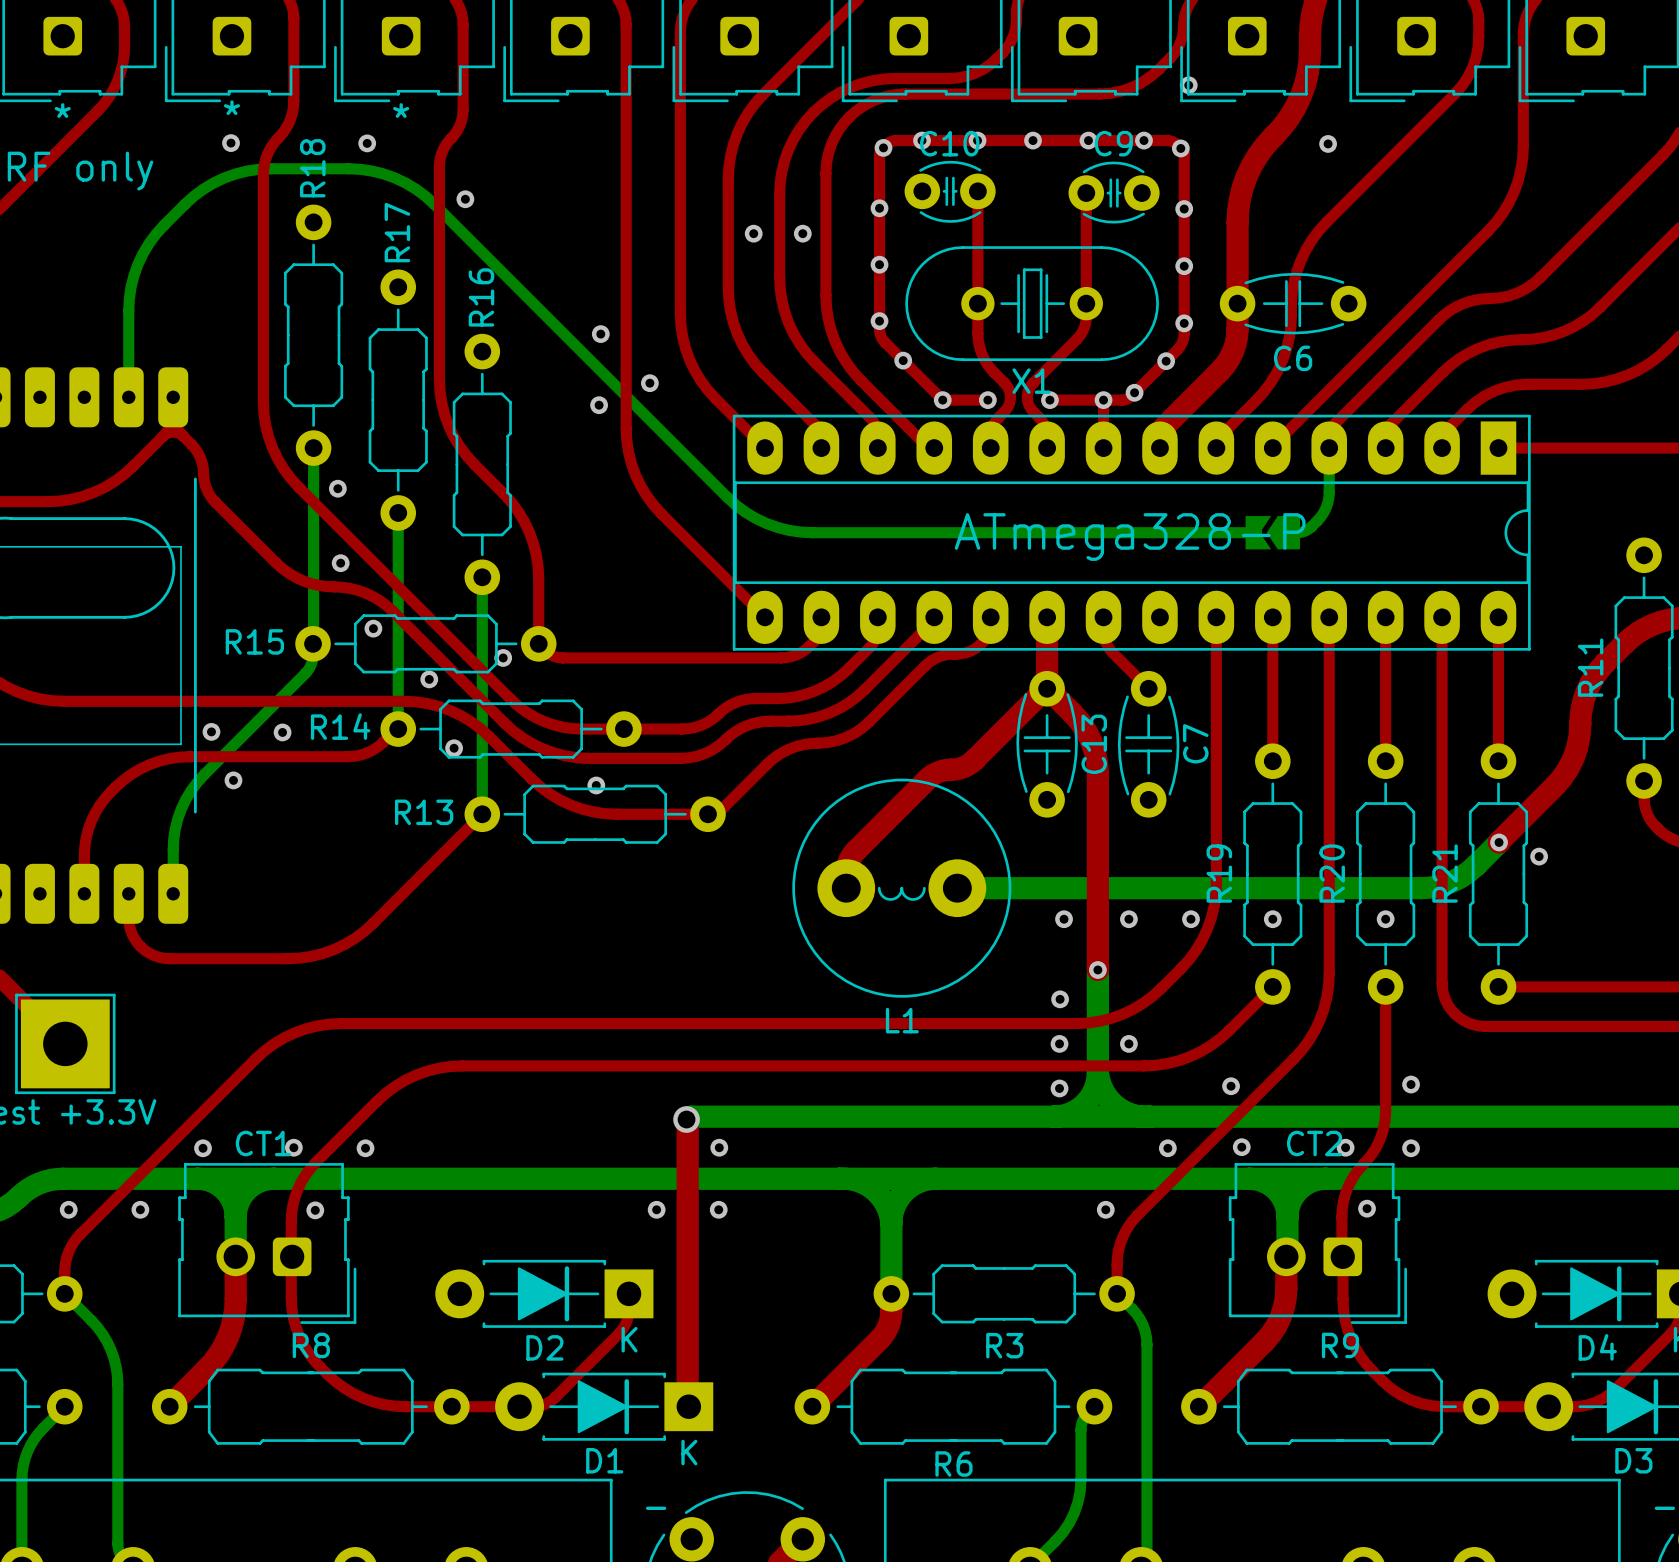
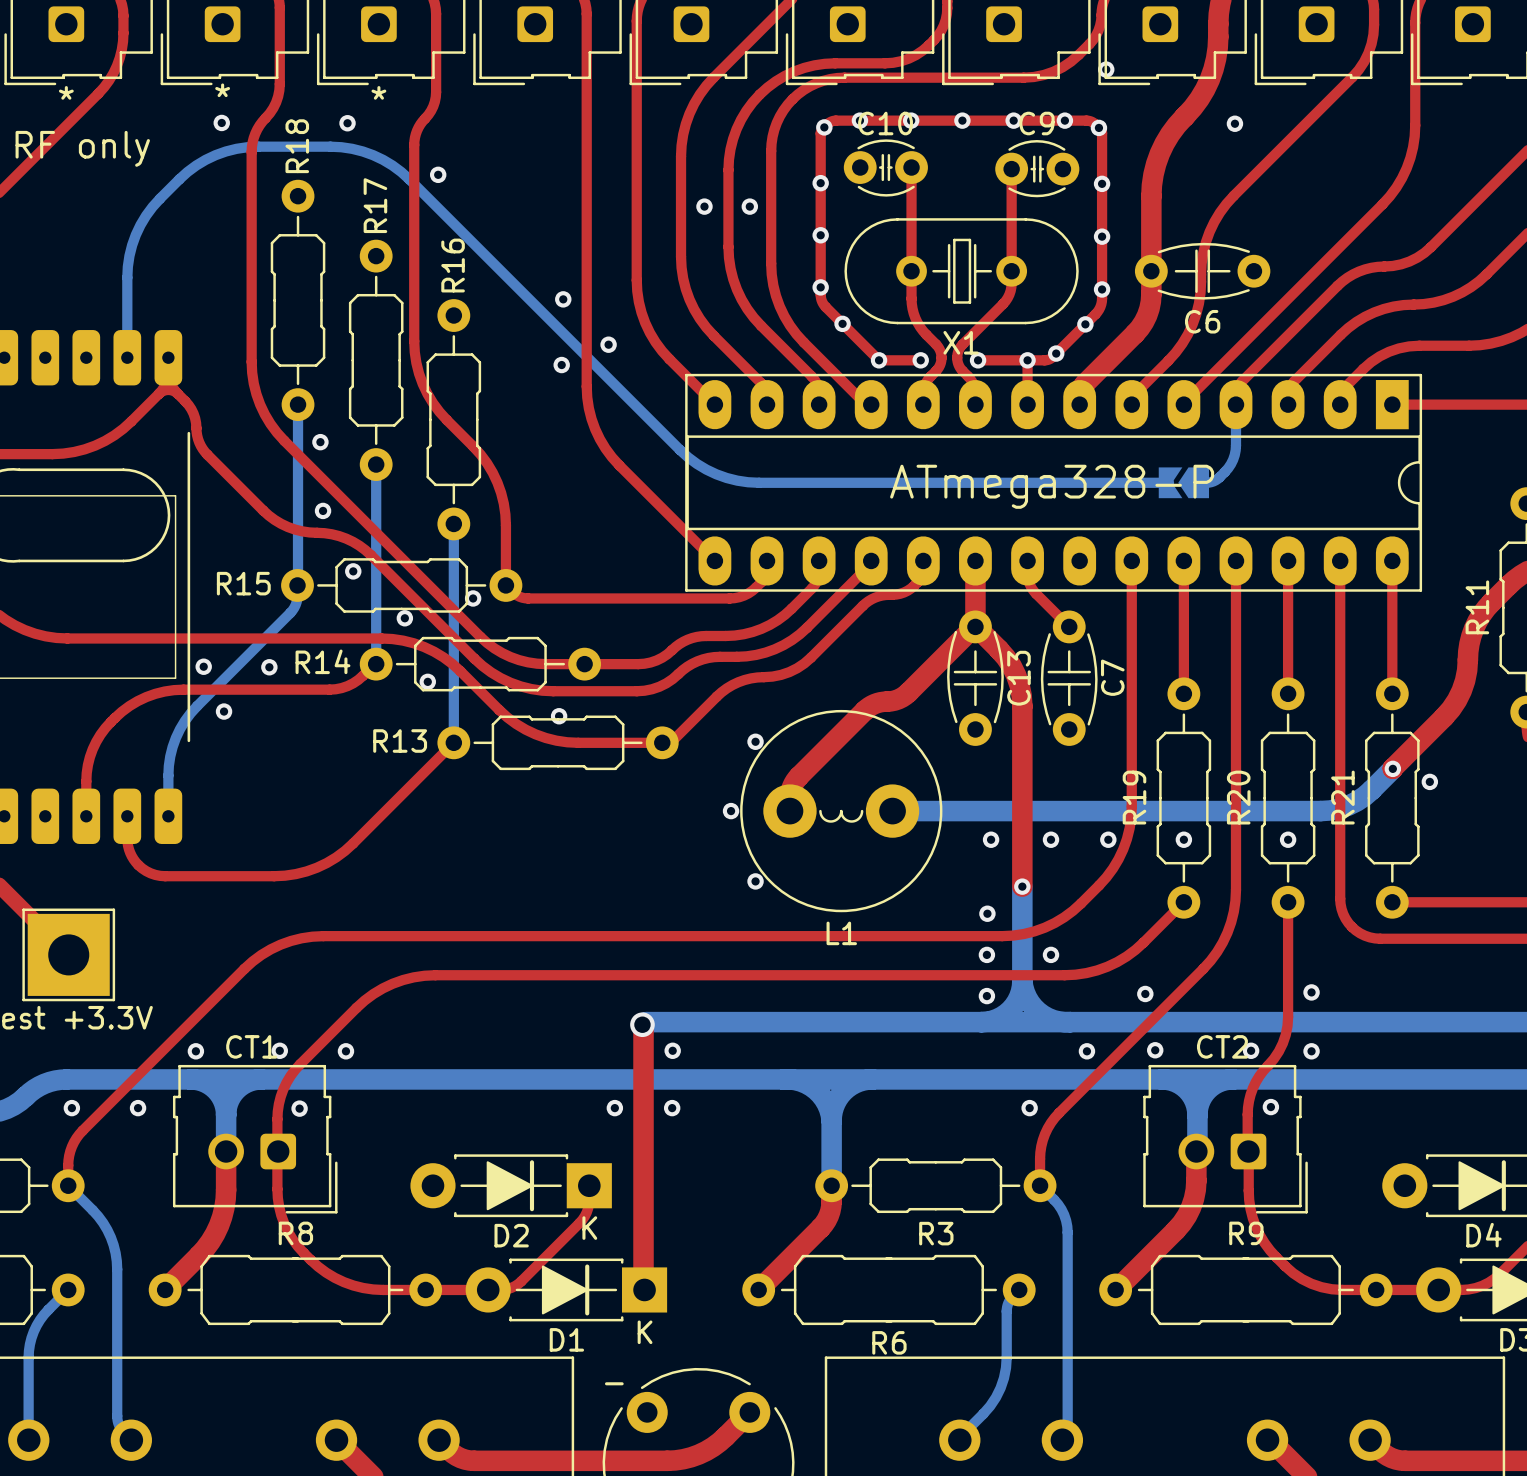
via: none -> (755, 741)
via: none -> (731, 811)
via: none -> (755, 881)

